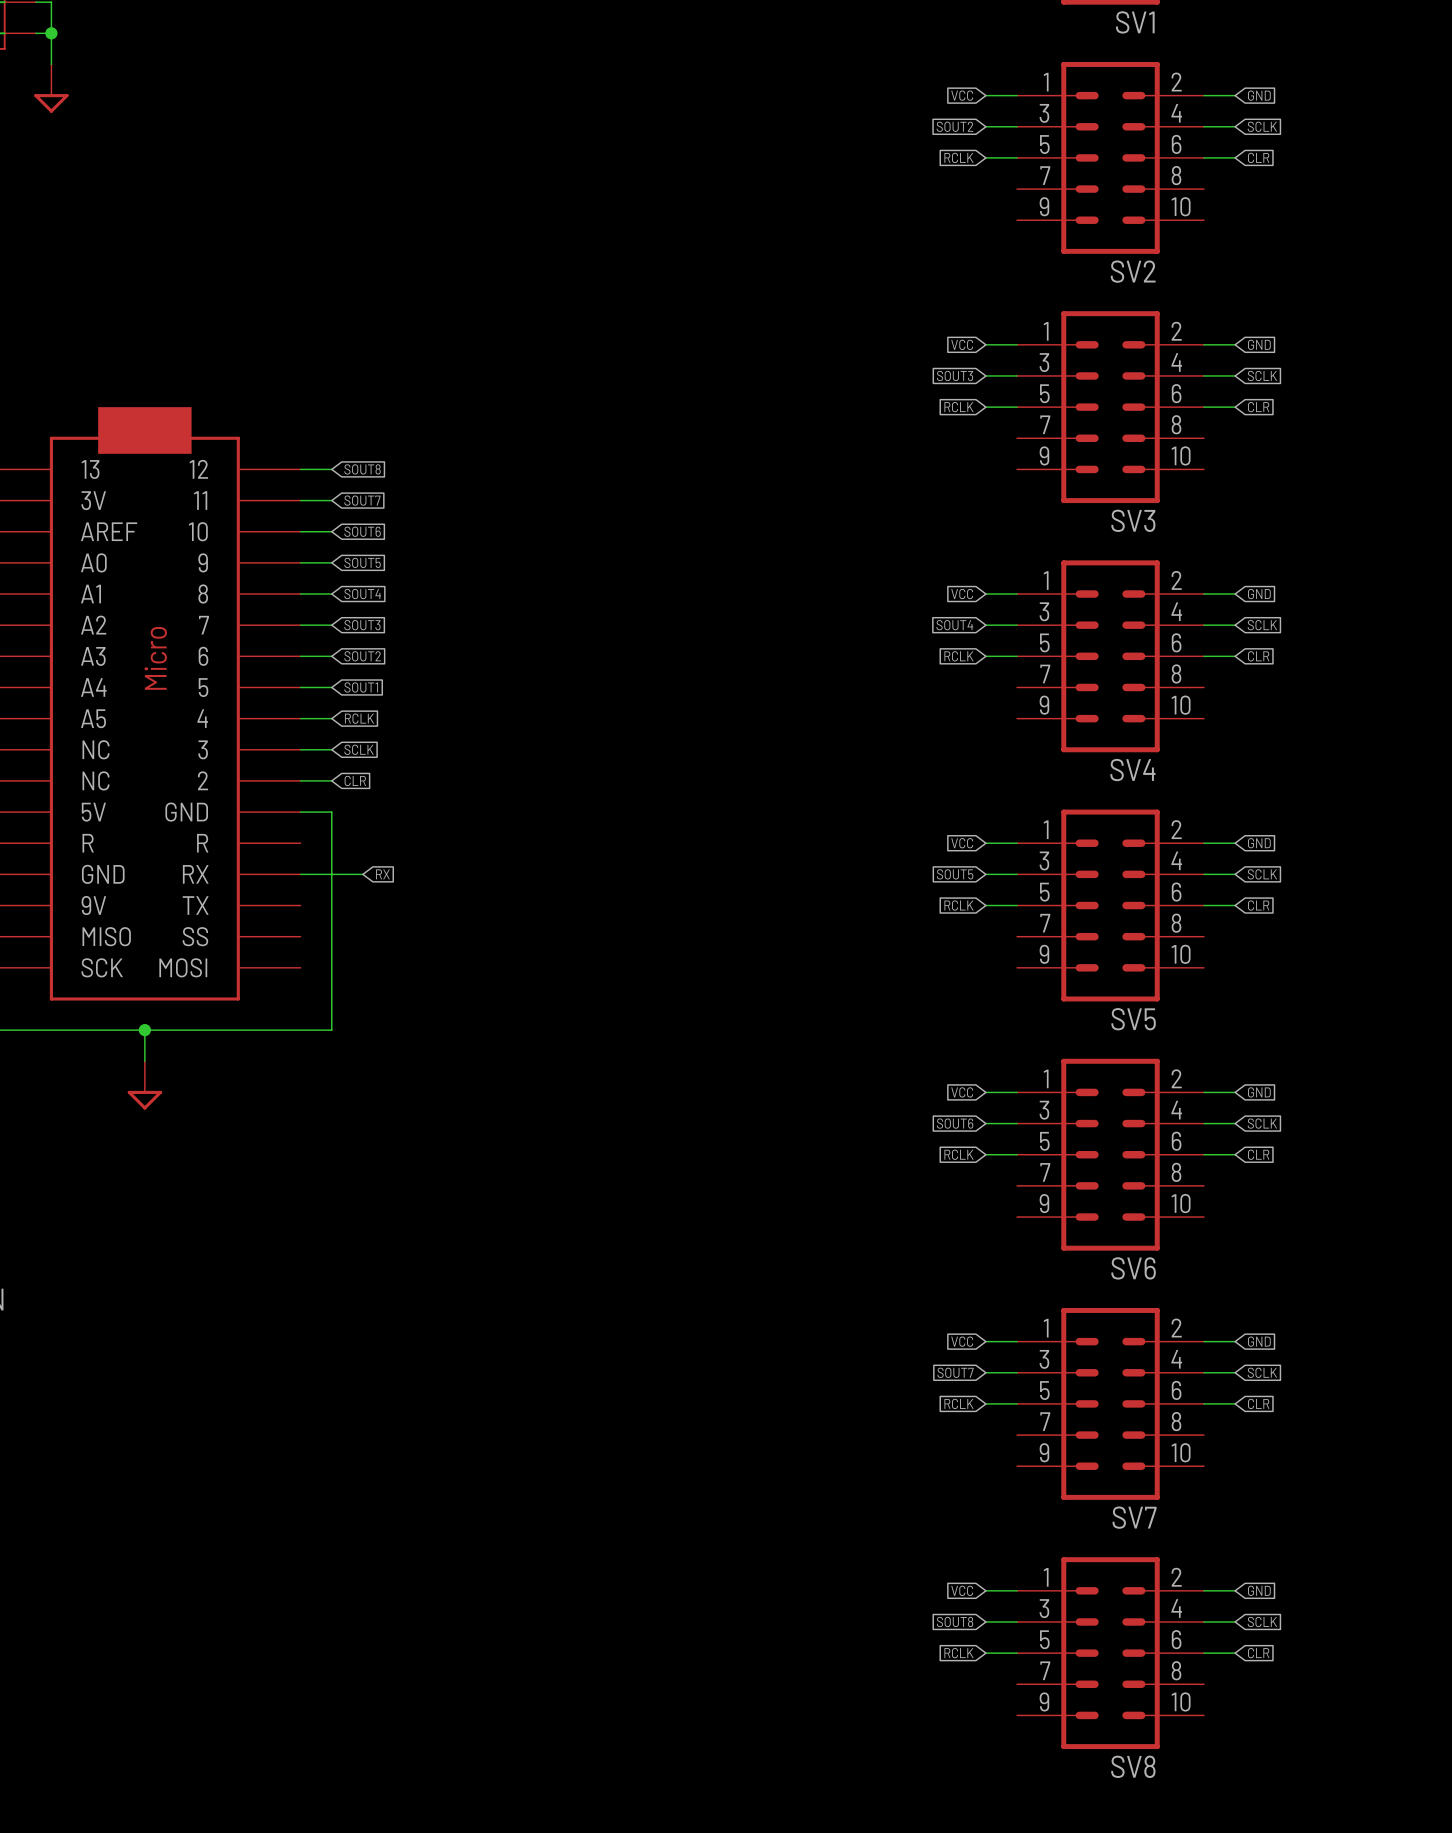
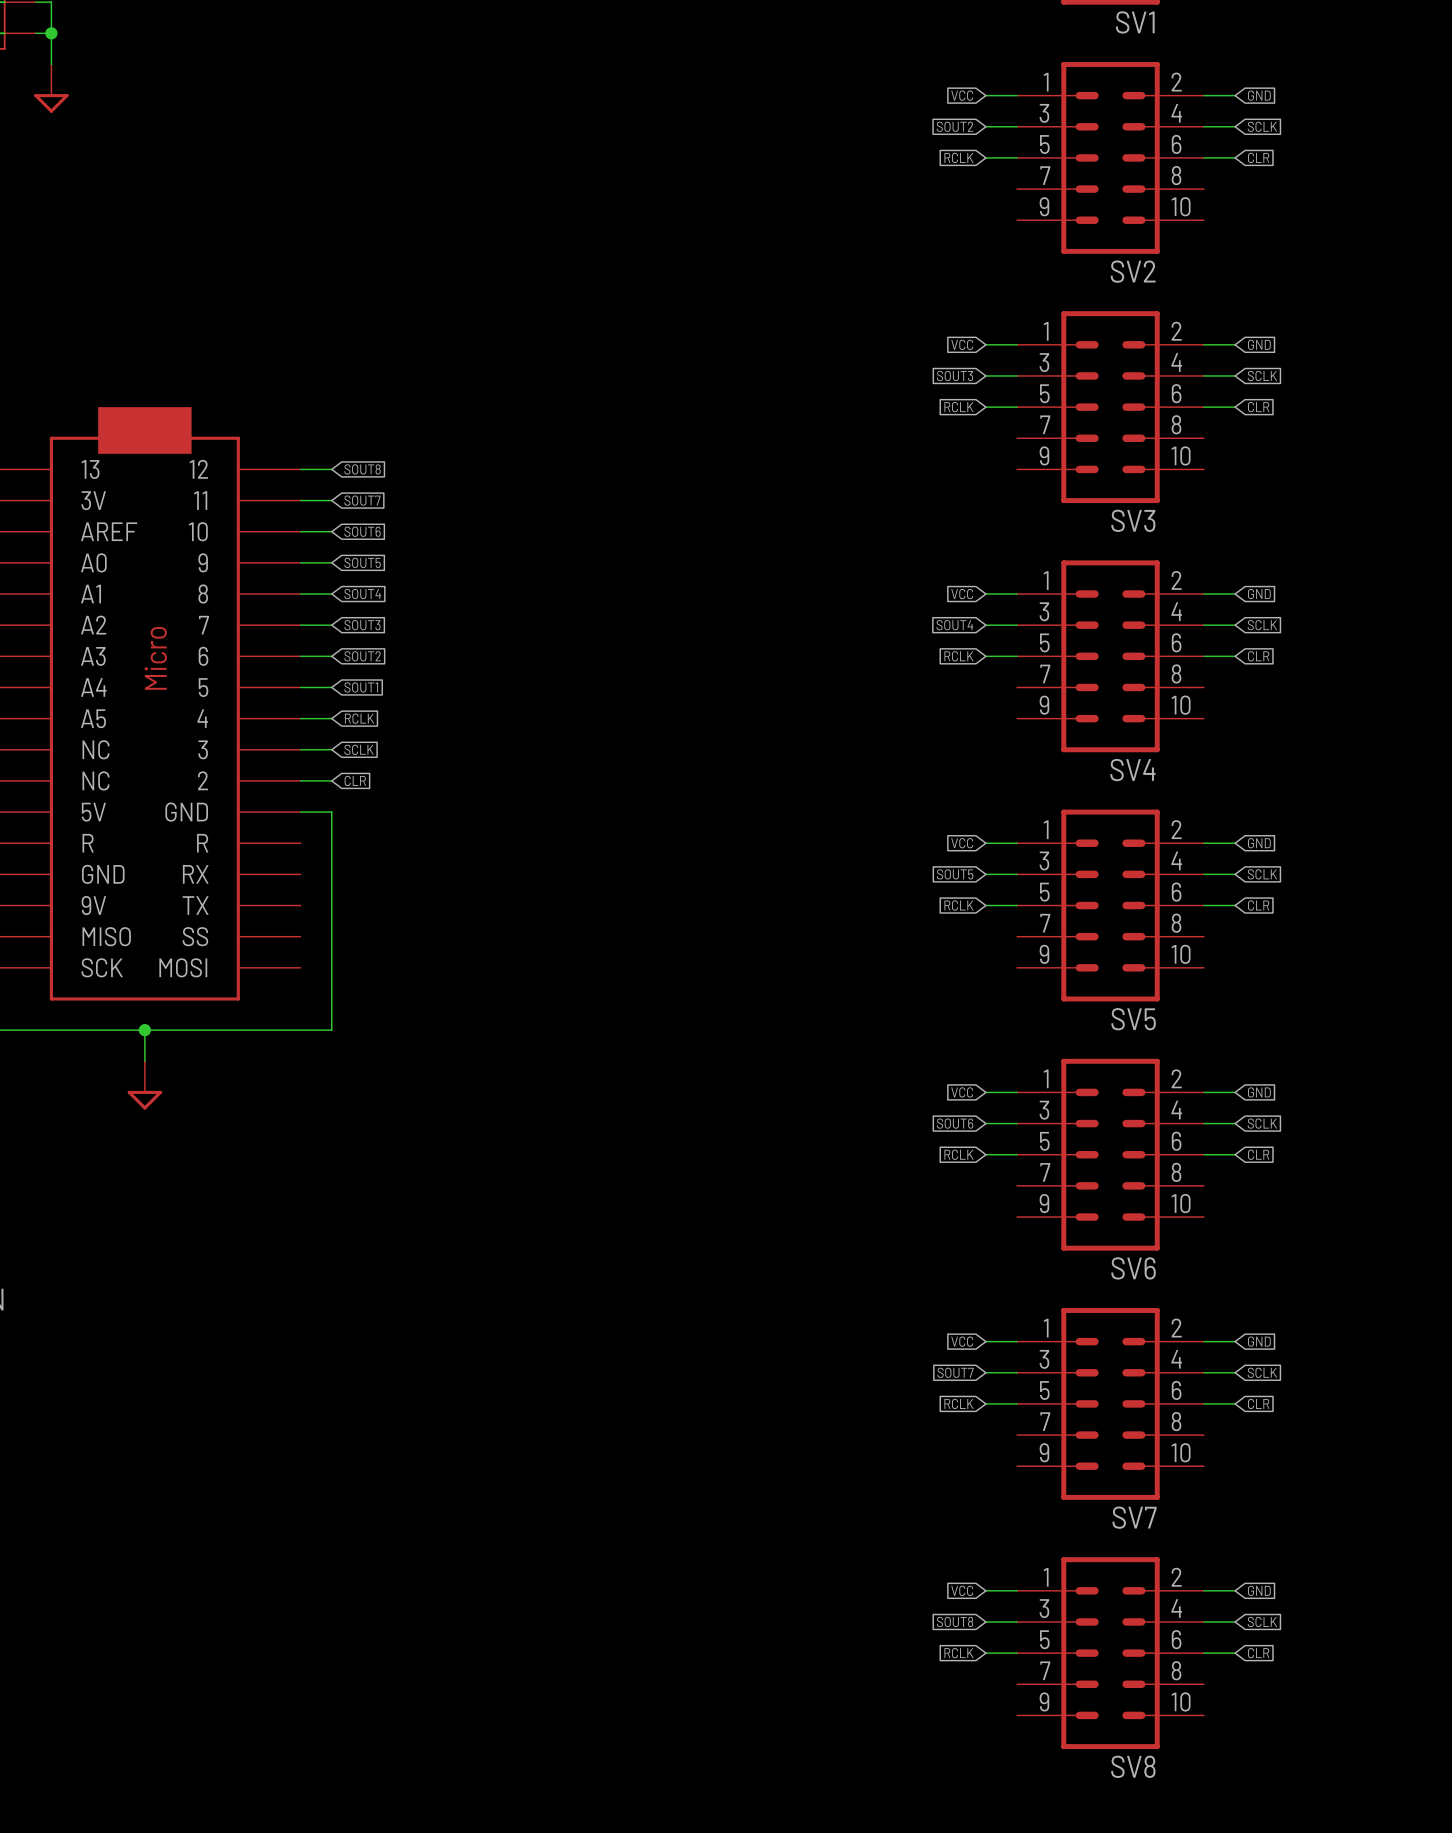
wire: (300, 874) (362, 874) -> none
global label: RX (382, 874) -> none

